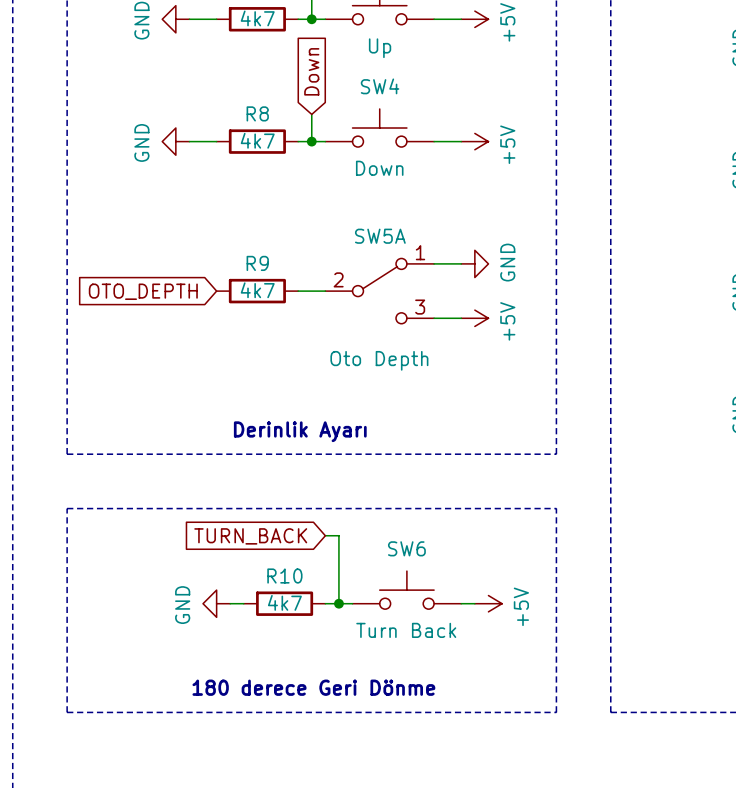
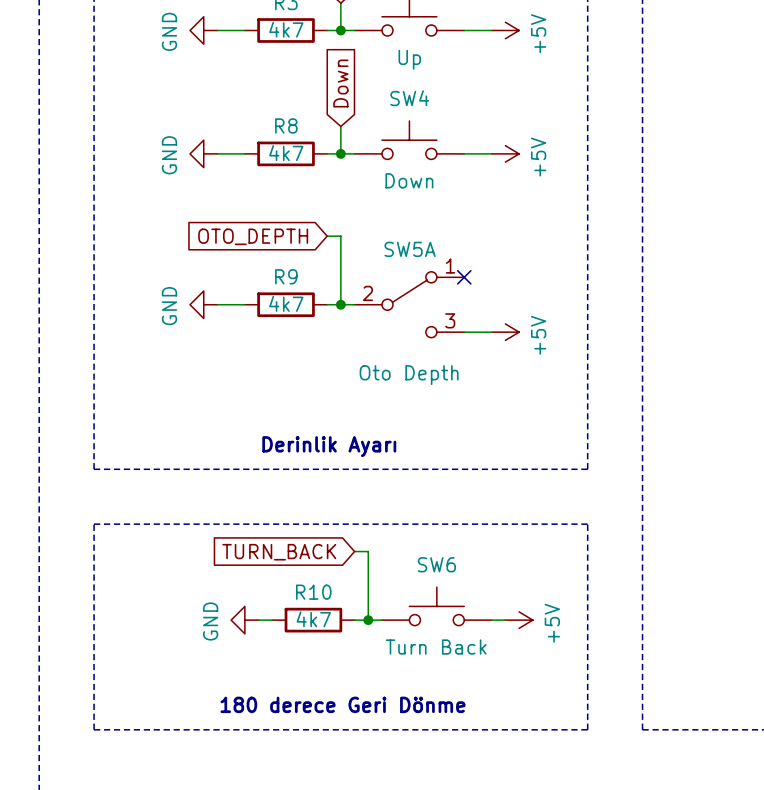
wire: none -> (327, 236) (340, 236) (340, 304)
wire: (434, 263) (461, 263) -> (217, 304) (244, 304)
no-connect mark: none -> (464, 277)
power symbol: GND (474, 263) -> none
global label position: OTO_DEPTH (143, 291) -> OTO_DEPTH (253, 236)
power symbol: none -> GND (203, 304)
junction: none -> (340, 304)

